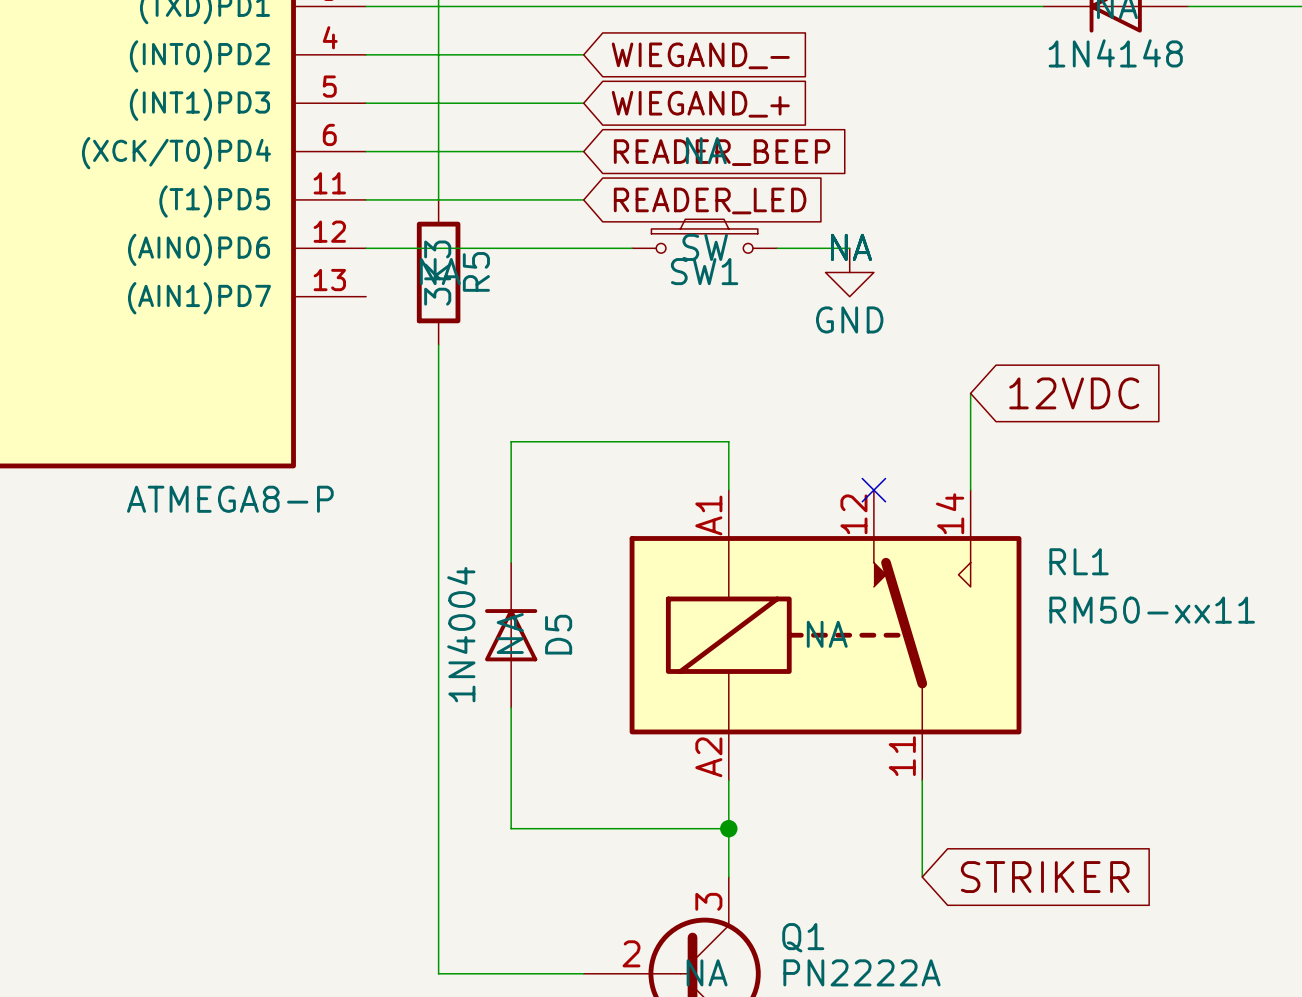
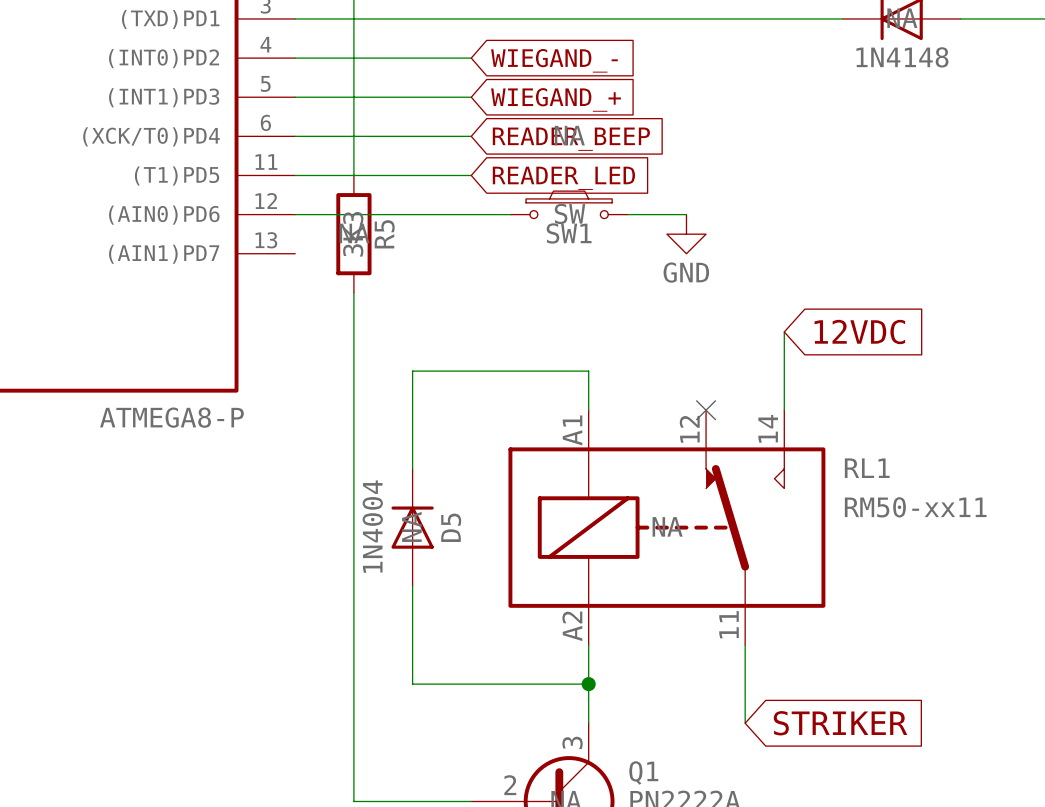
power symbol text: NA (851, 247) -> none
power symbol text: NA (851, 247) -> none

